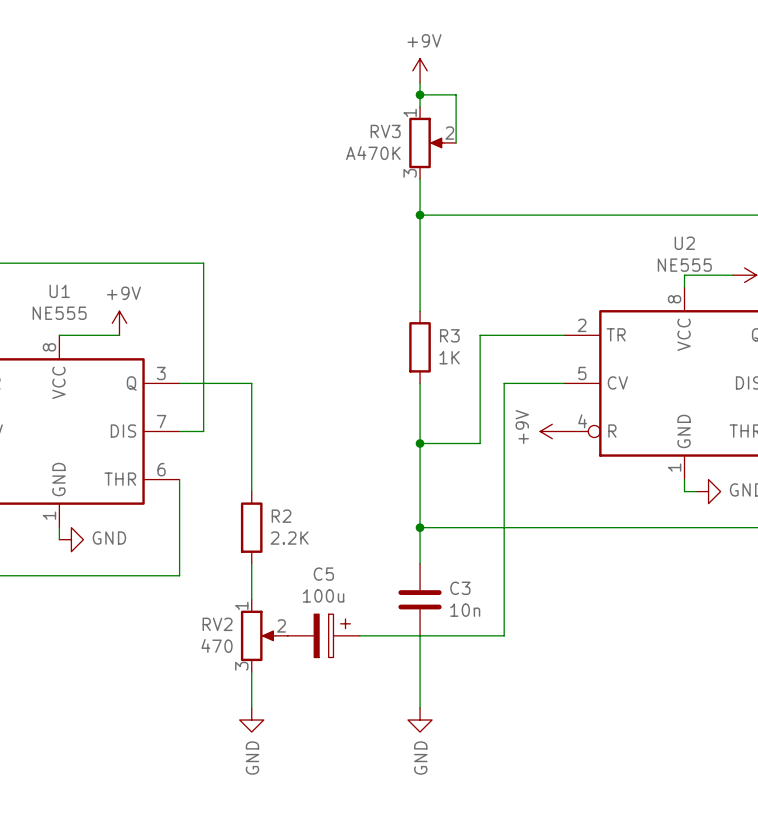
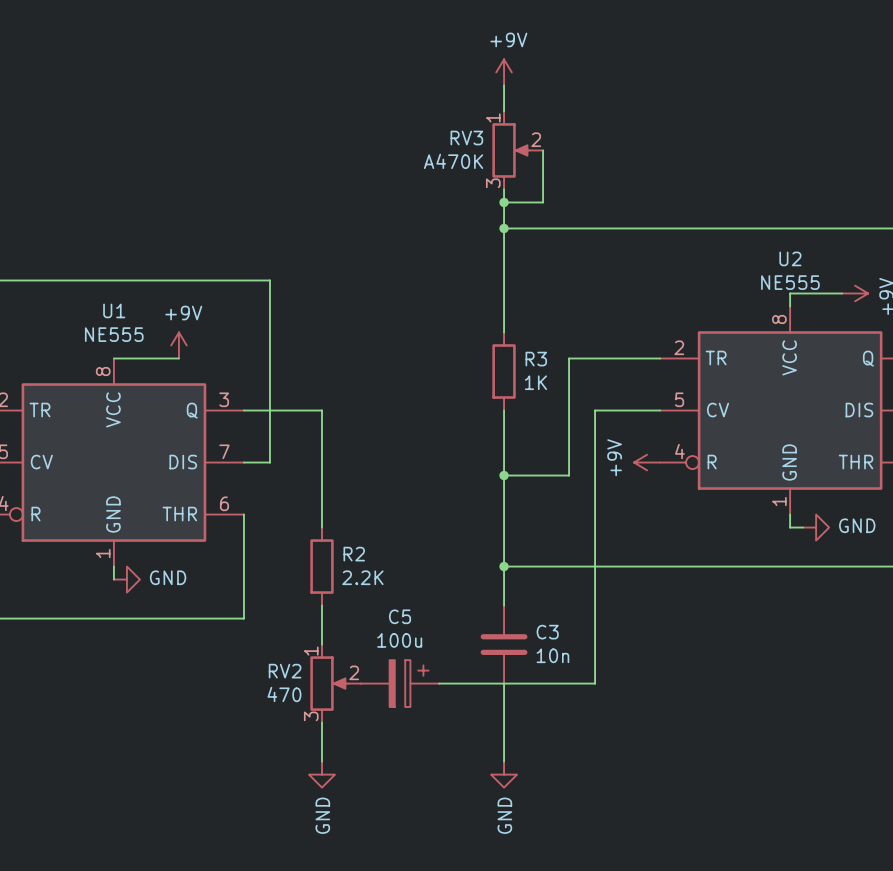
wire: (420, 94) (456, 94) (456, 142) -> (504, 202) (543, 202) (543, 150)
junction: (420, 94) -> none
junction: none -> (504, 202)

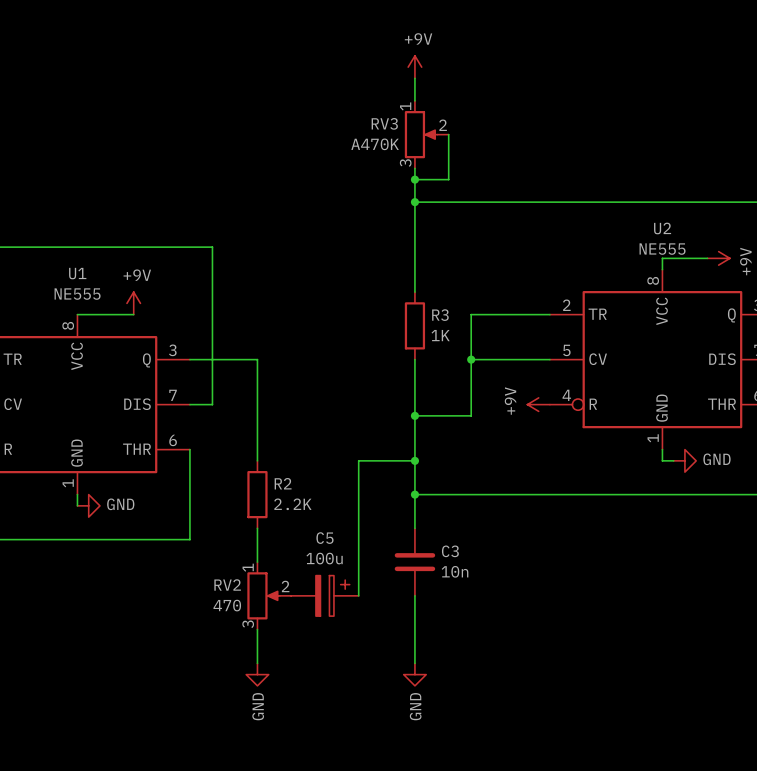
wire: none -> (471, 359) (493, 359)
junction: none -> (471, 359)
wire: (595, 410) (595, 683) (439, 683) -> (414, 460) (358, 460) (358, 595)
junction: none -> (414, 460)

